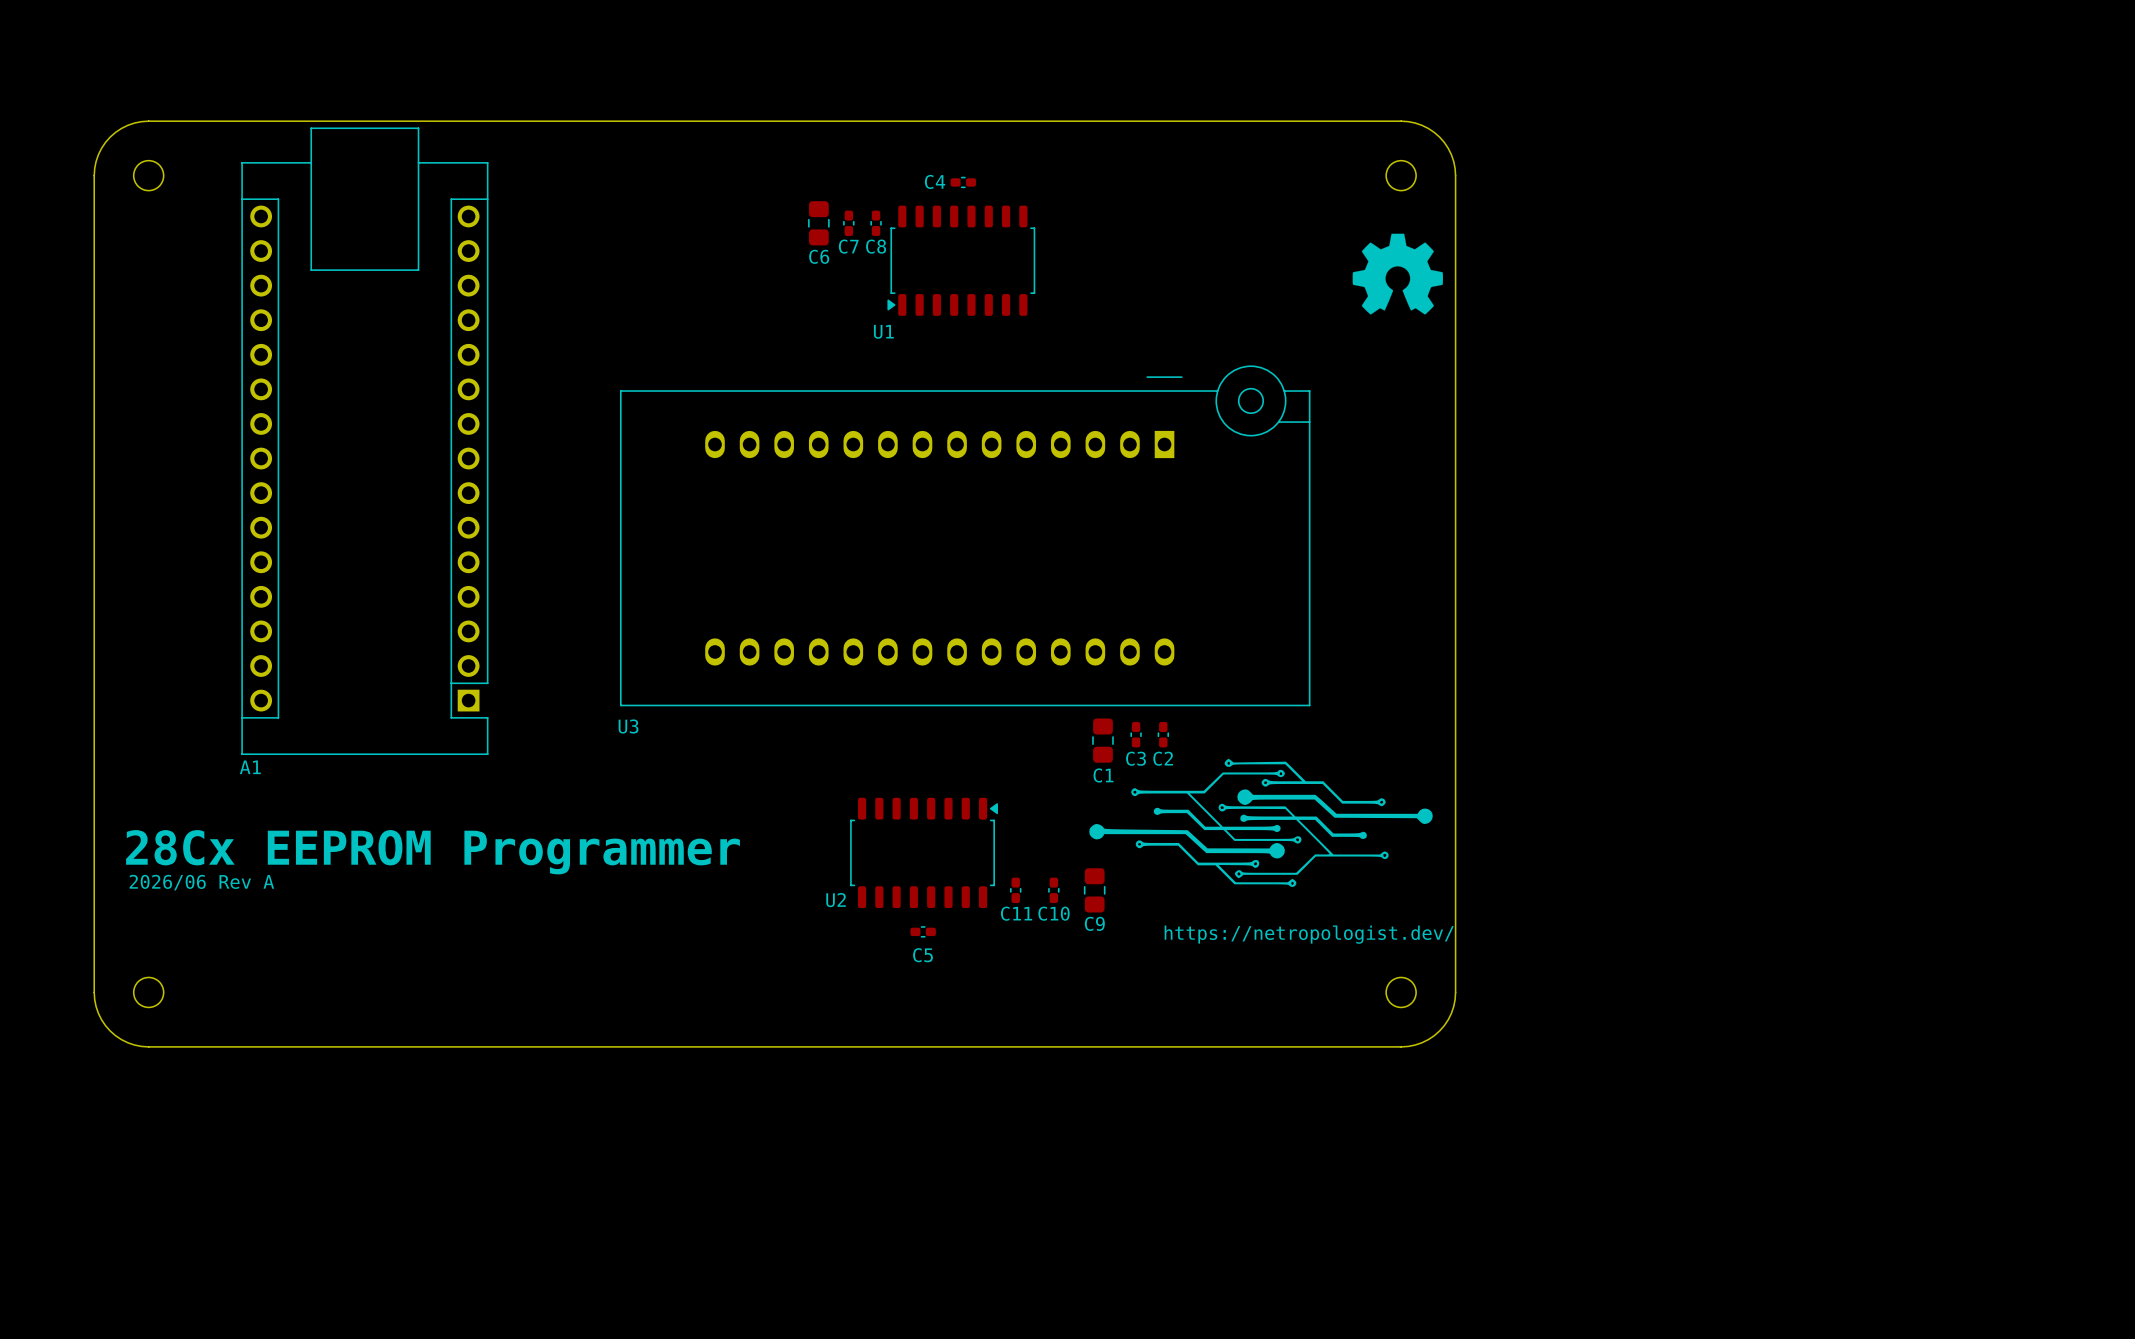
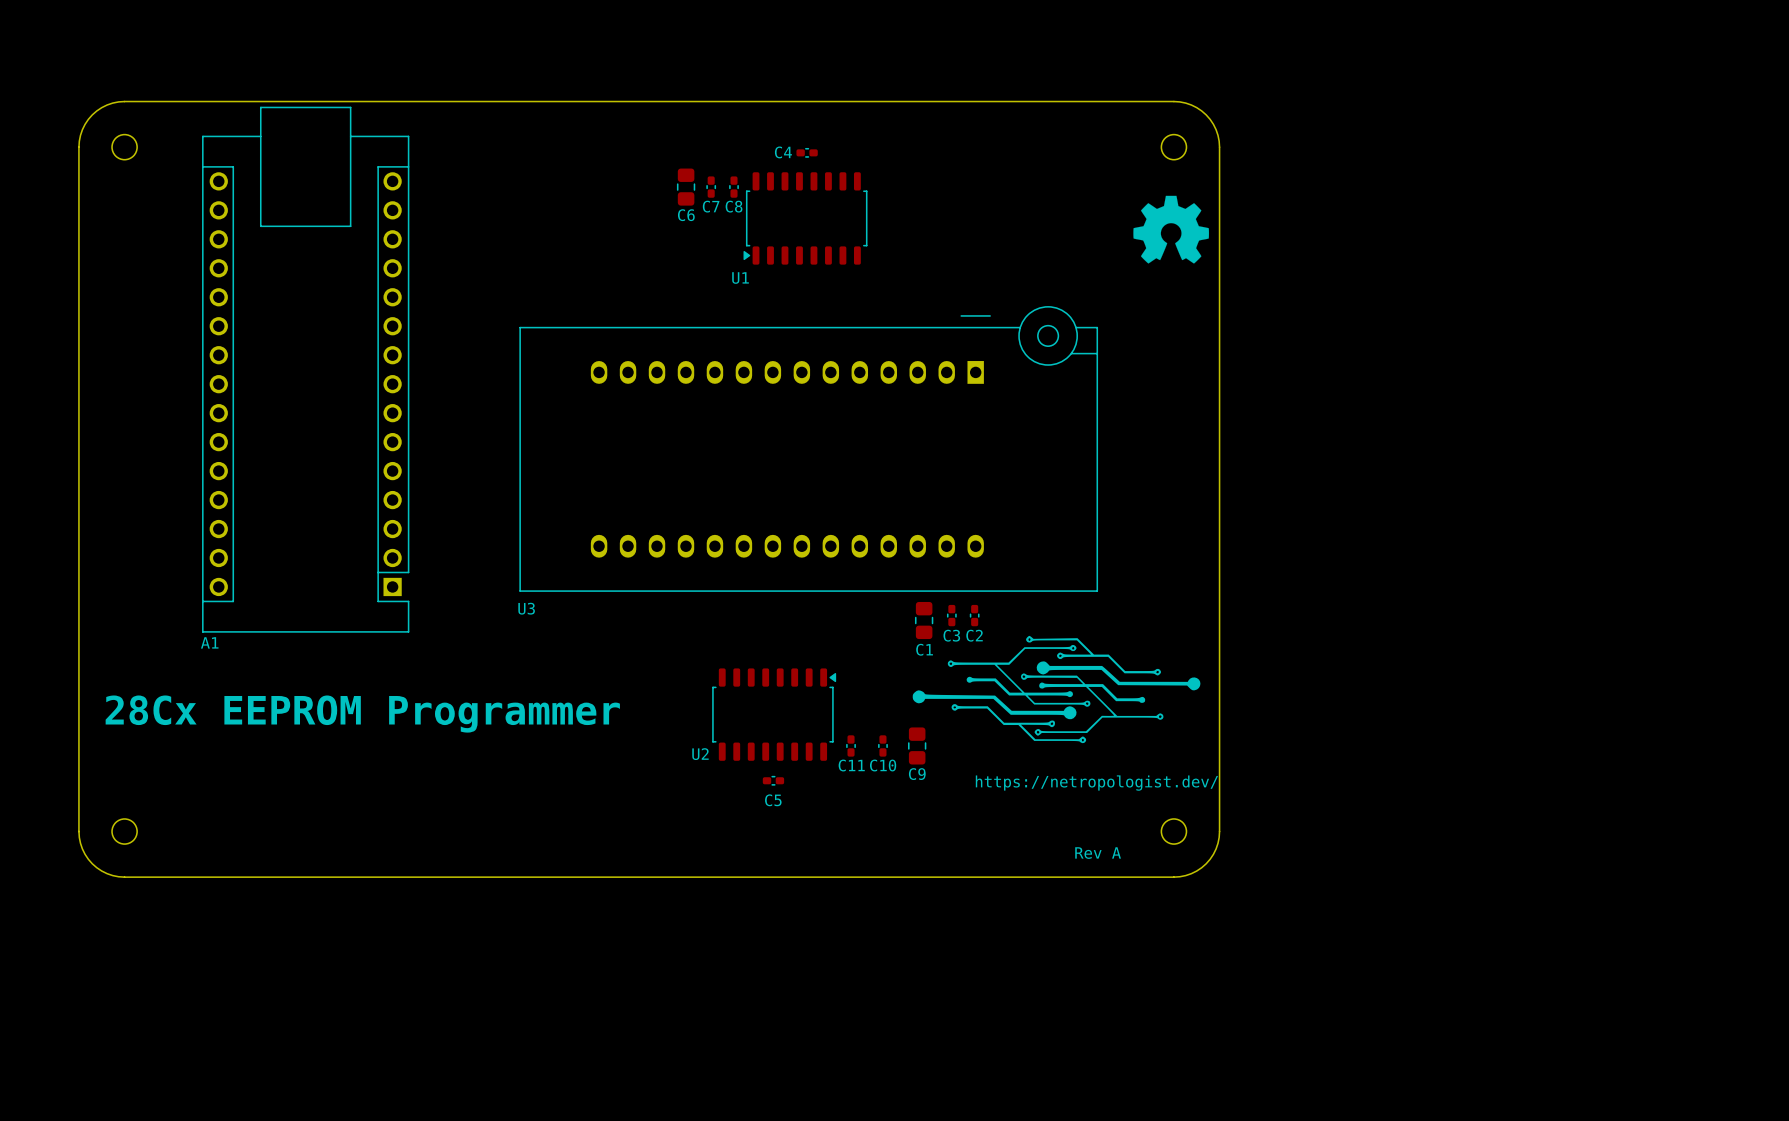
text: 2026/06 Rev A (201, 882) -> none
text: none -> Rev A (1098, 853)

